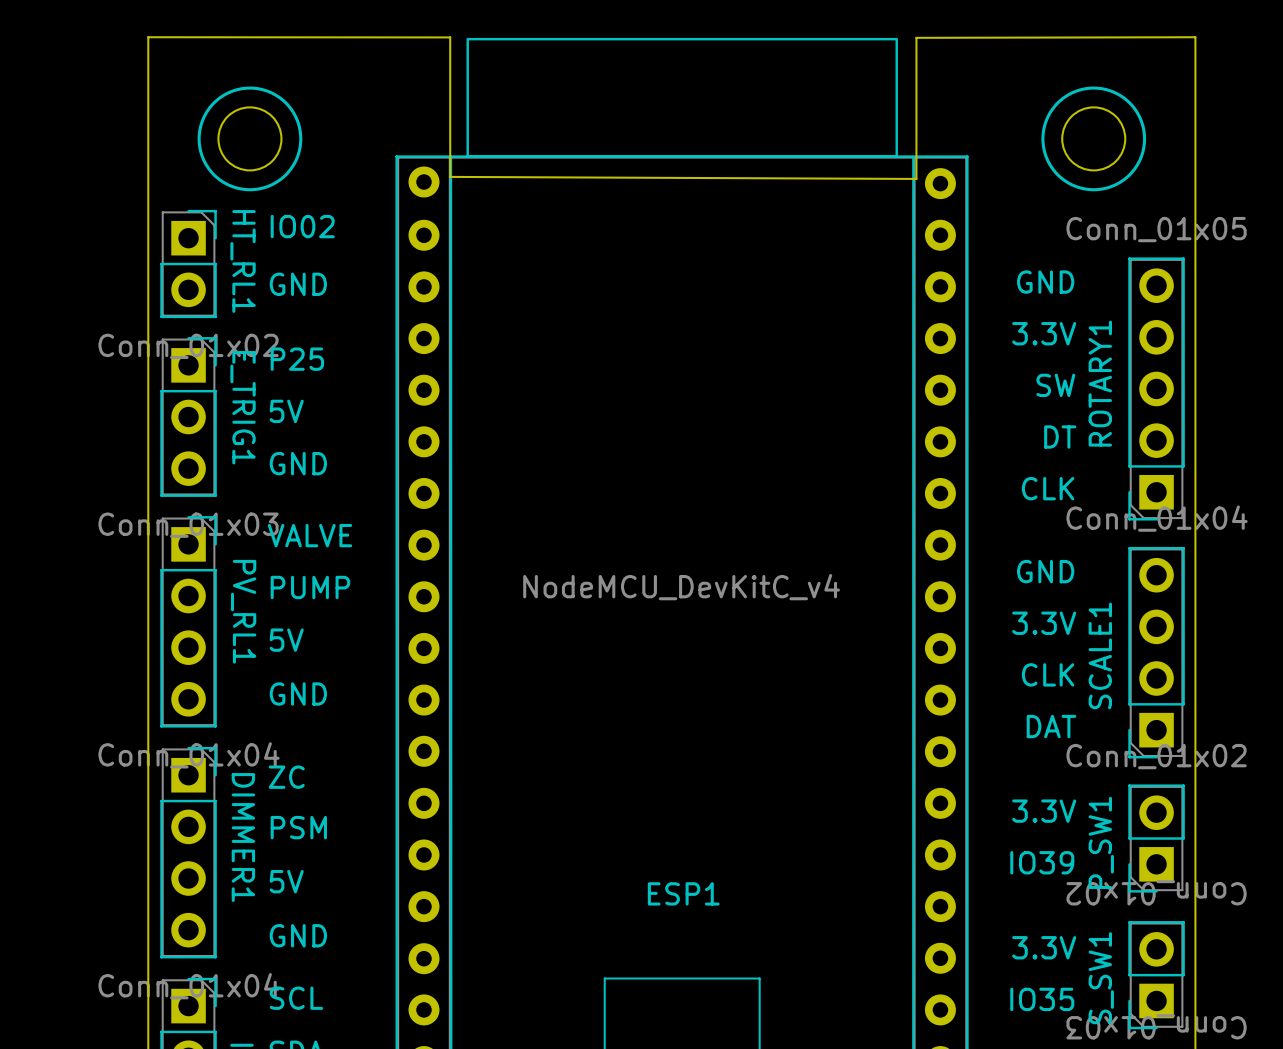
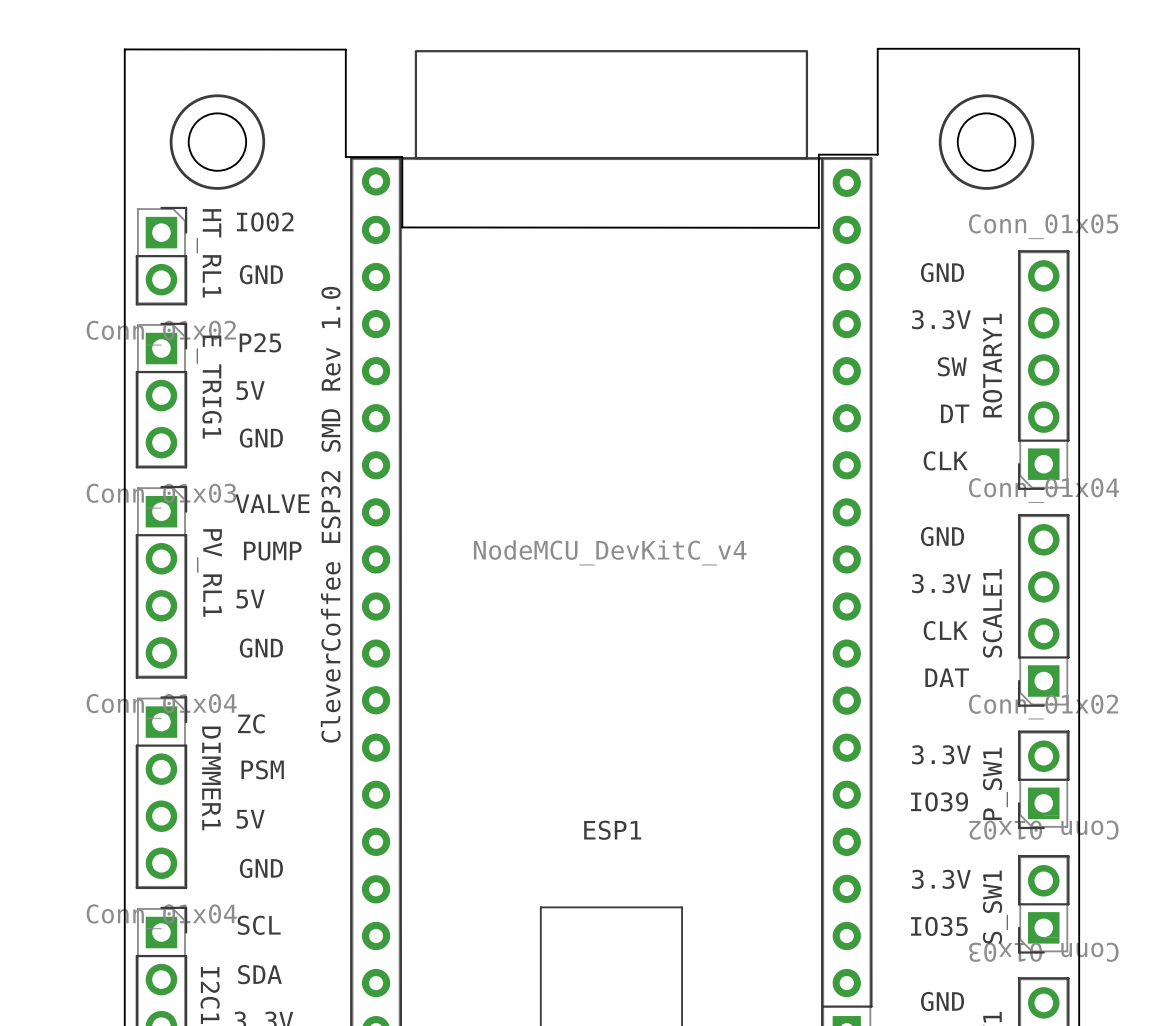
board edge: (148, 37) (450, 37) (450, 176) (916, 178) (916, 37) (1195, 37) -> (124, 49) (345, 49) (345, 157) (402, 157) (402, 227) (818, 227) (818, 154) (877, 154) (877, 48) (1079, 49)
text: none -> CleverCoffee ESP32 SMD Rev 1.0 (330, 514)

